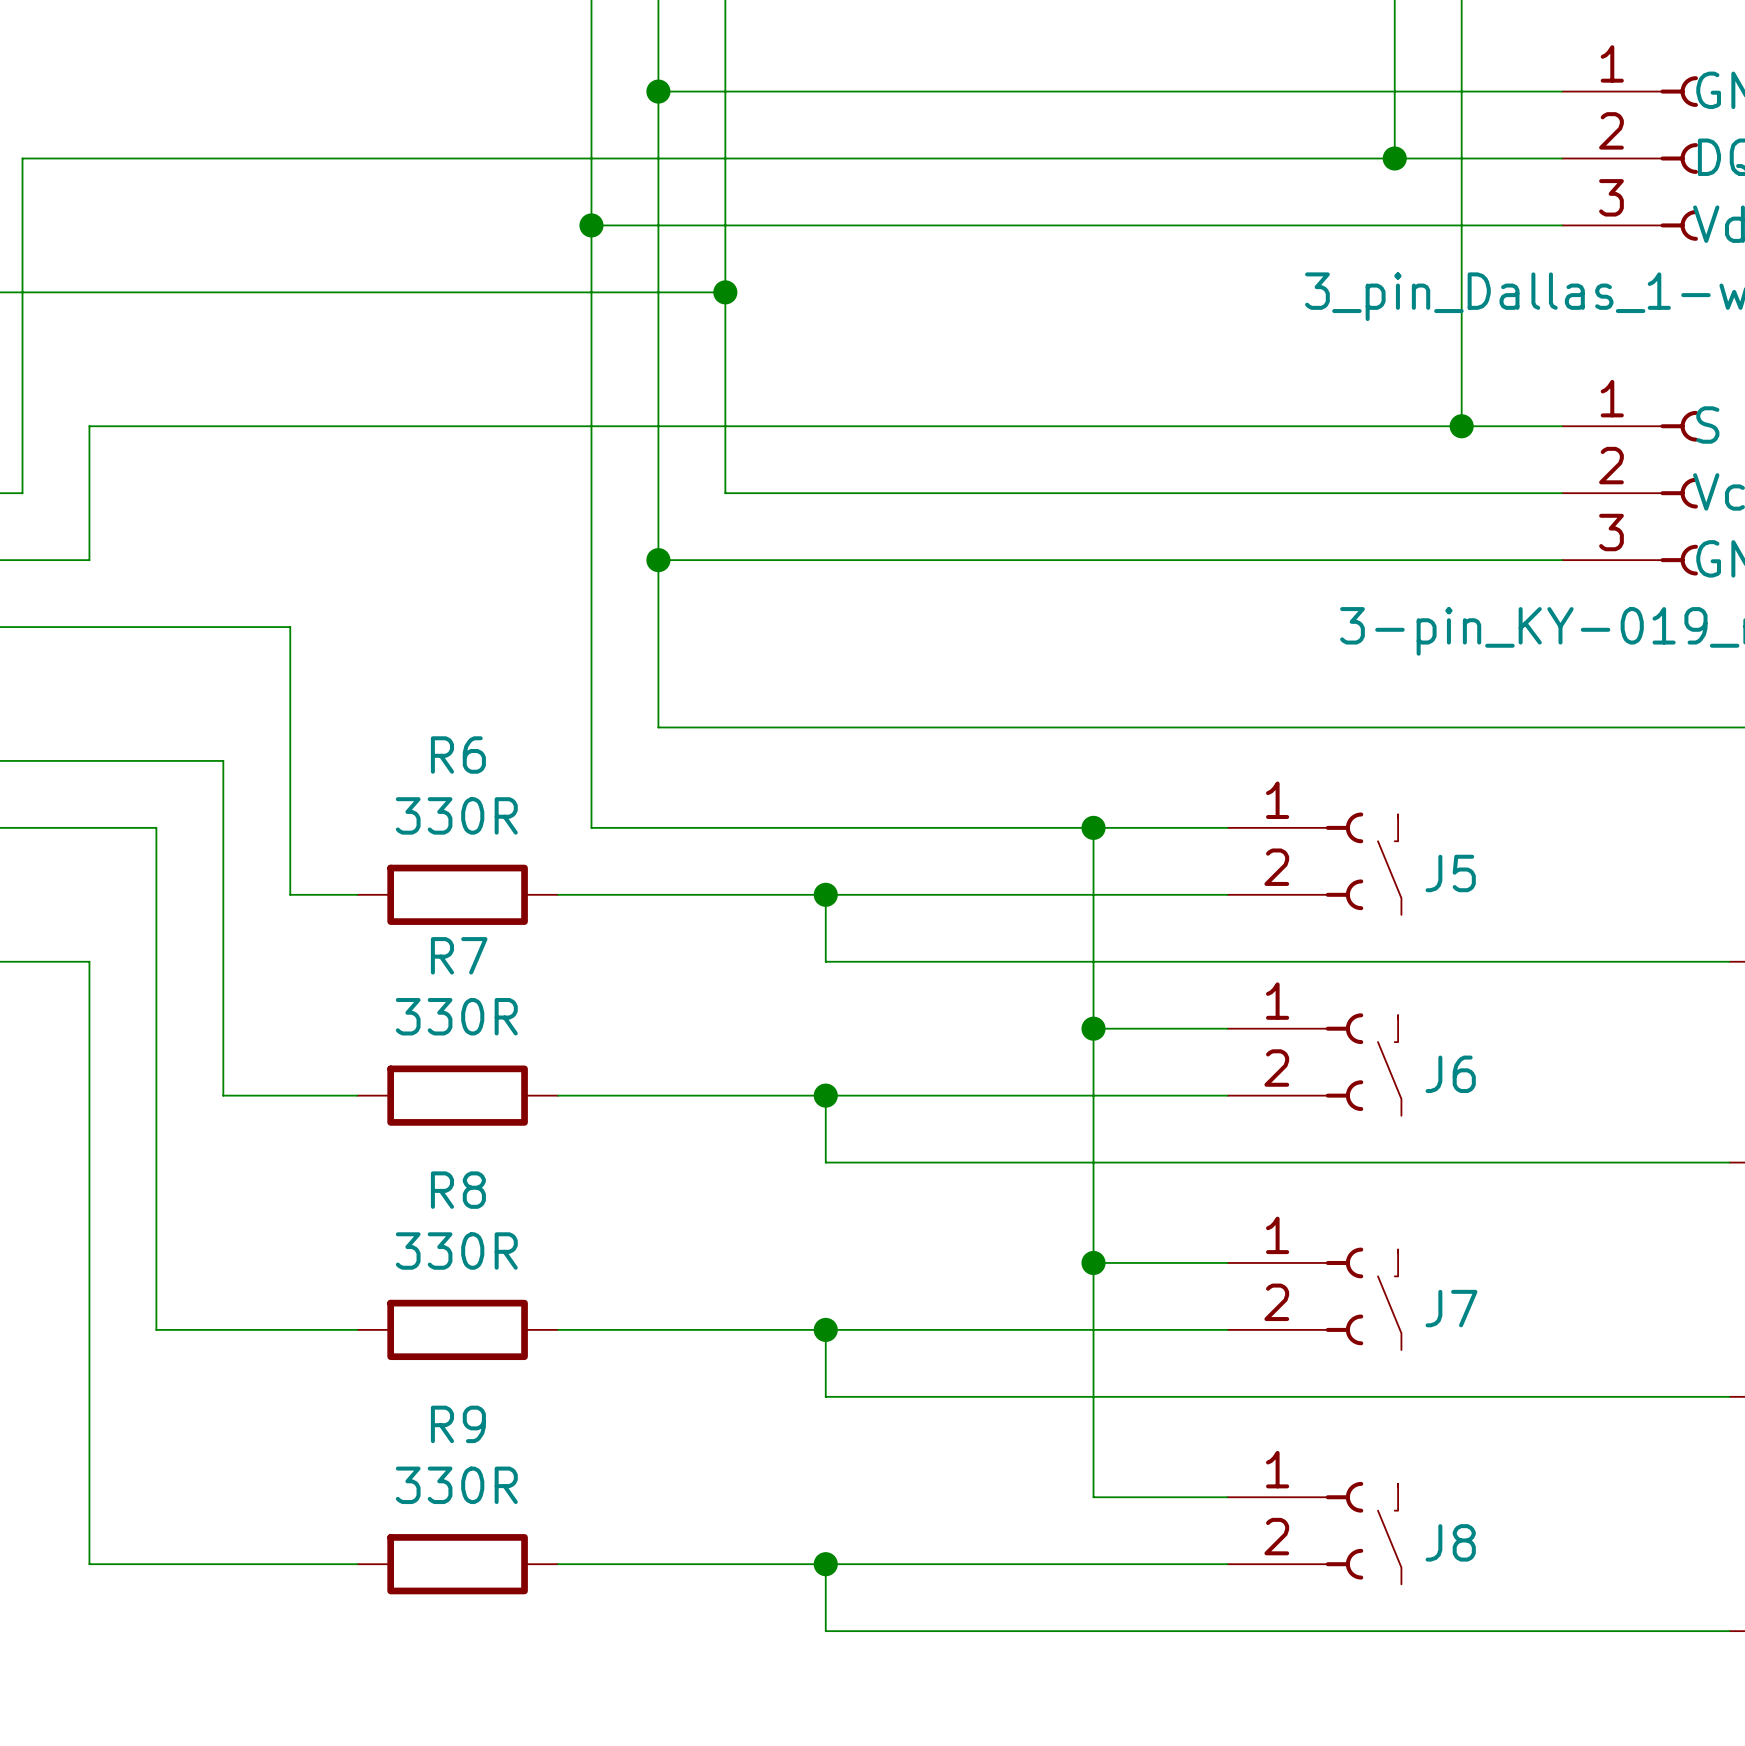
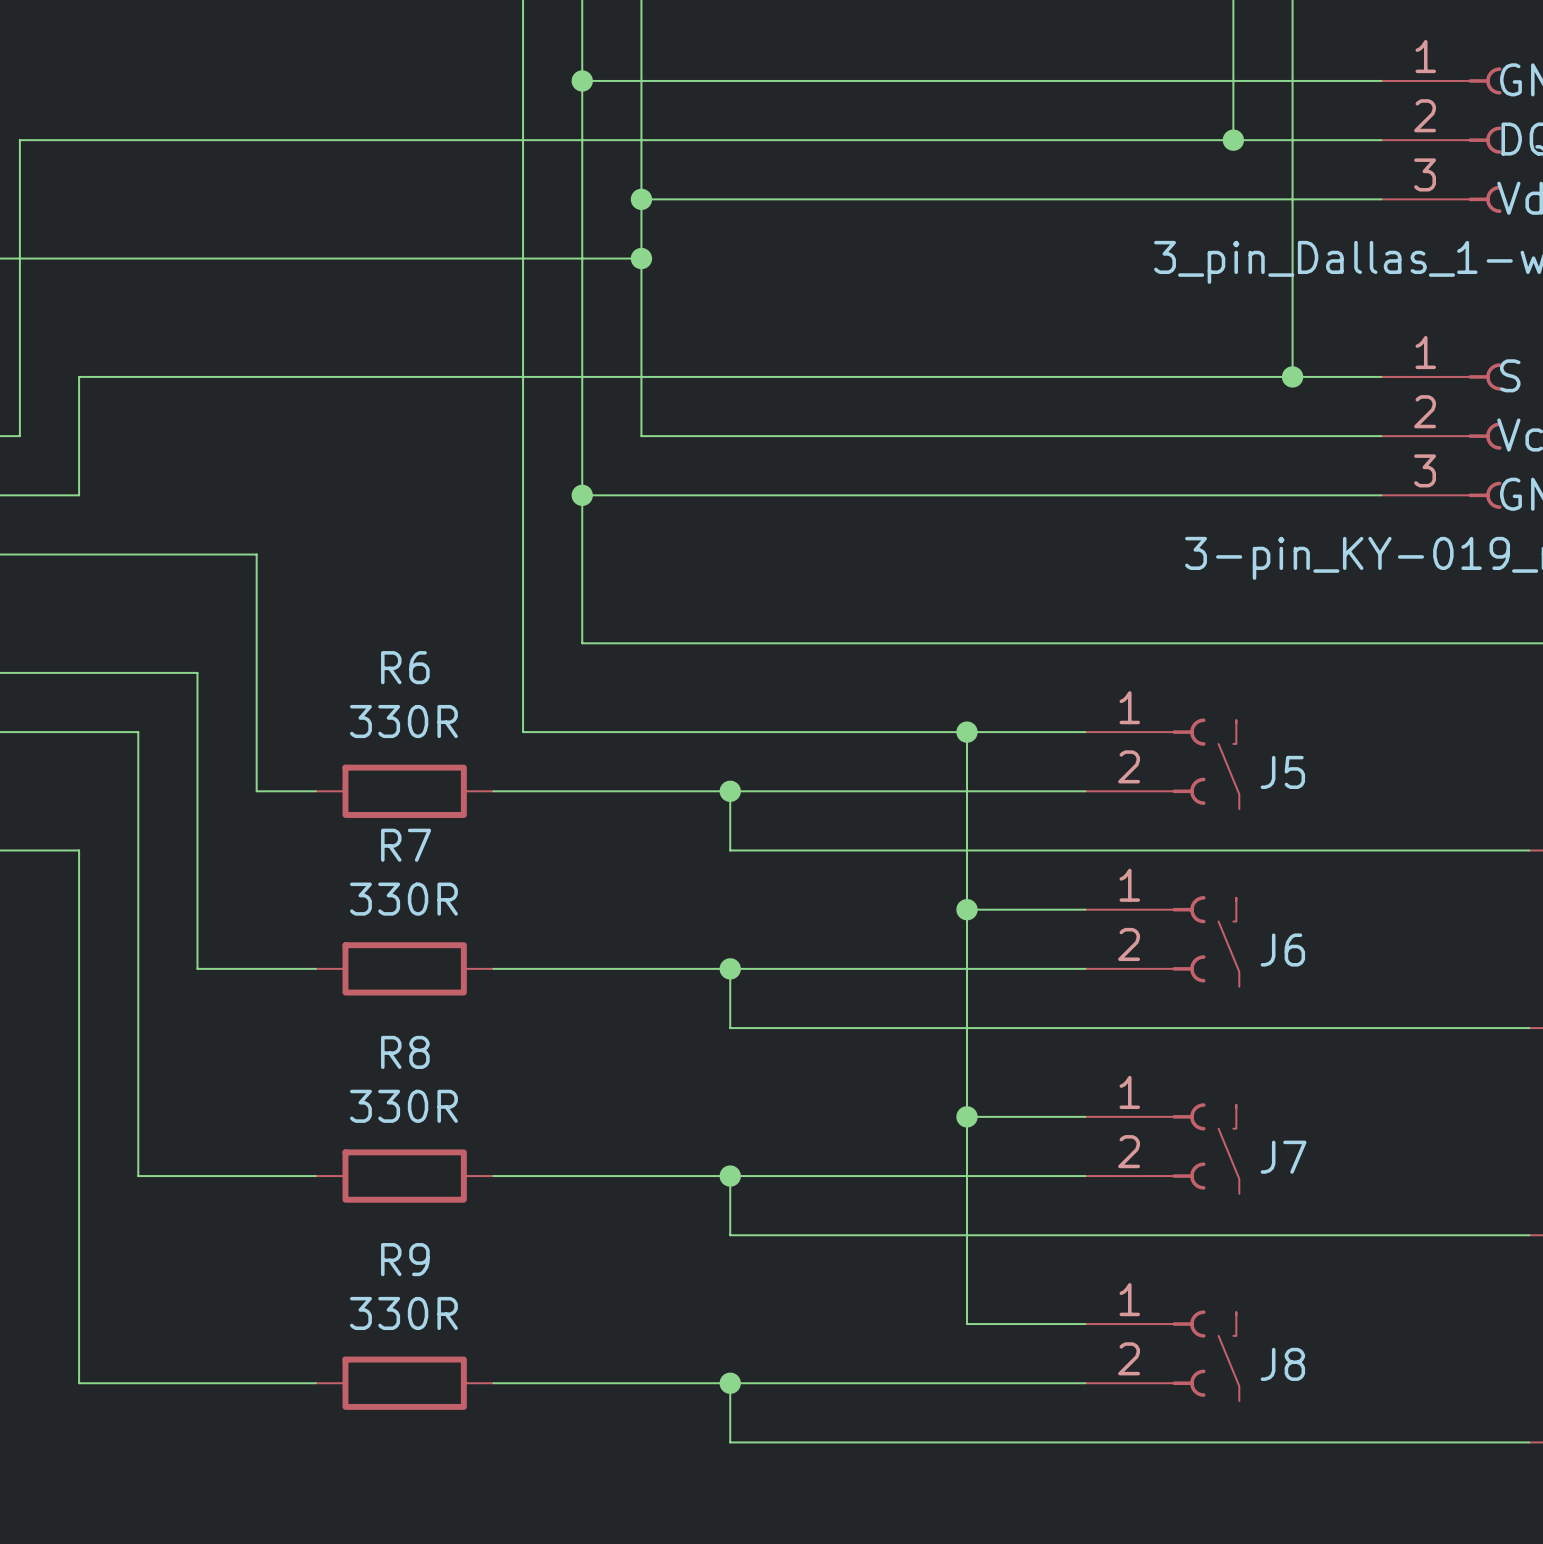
wire: (591, 225) (725, 225) -> none
junction position: (591, 225) -> (641, 199)

